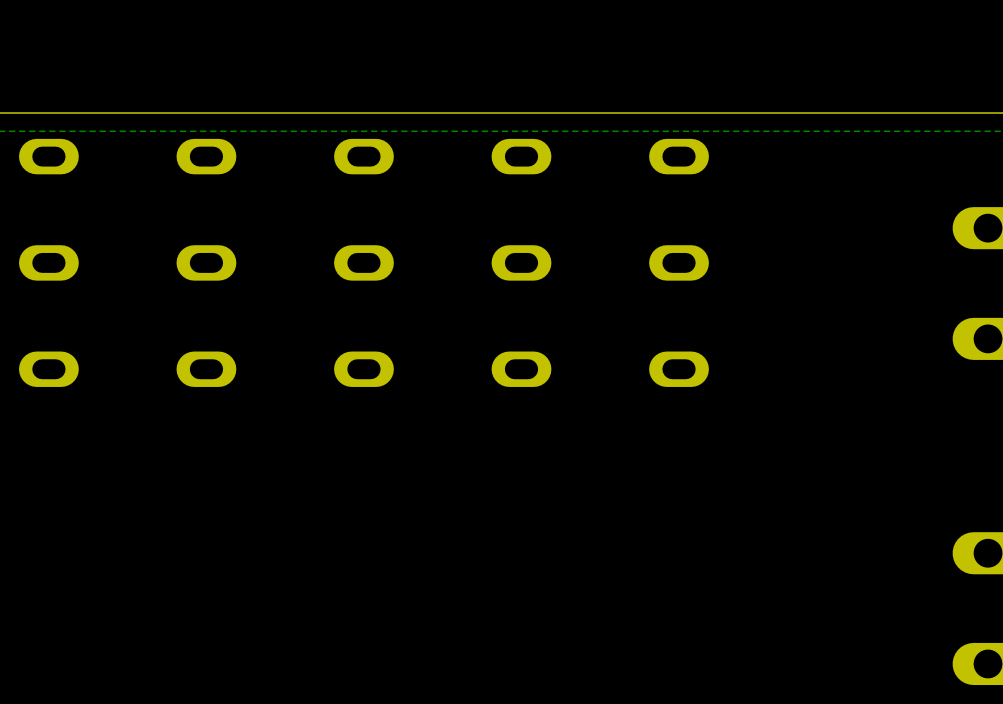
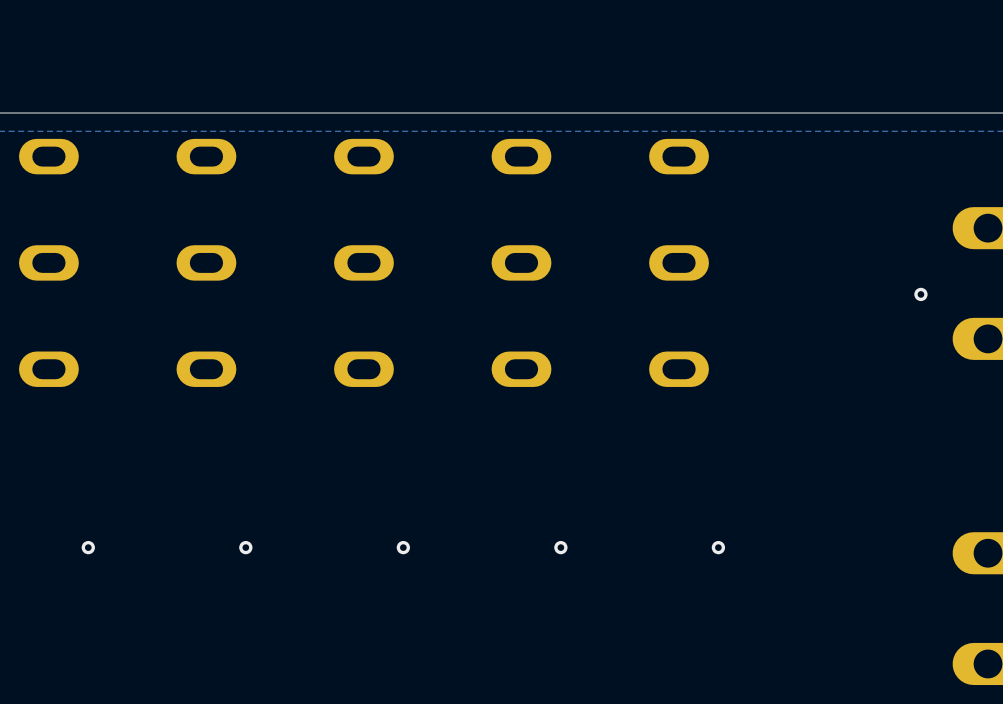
via: none -> (920, 294)
via: none -> (88, 547)
via: none -> (245, 547)
via: none -> (403, 547)
via: none -> (560, 547)
via: none -> (718, 547)

